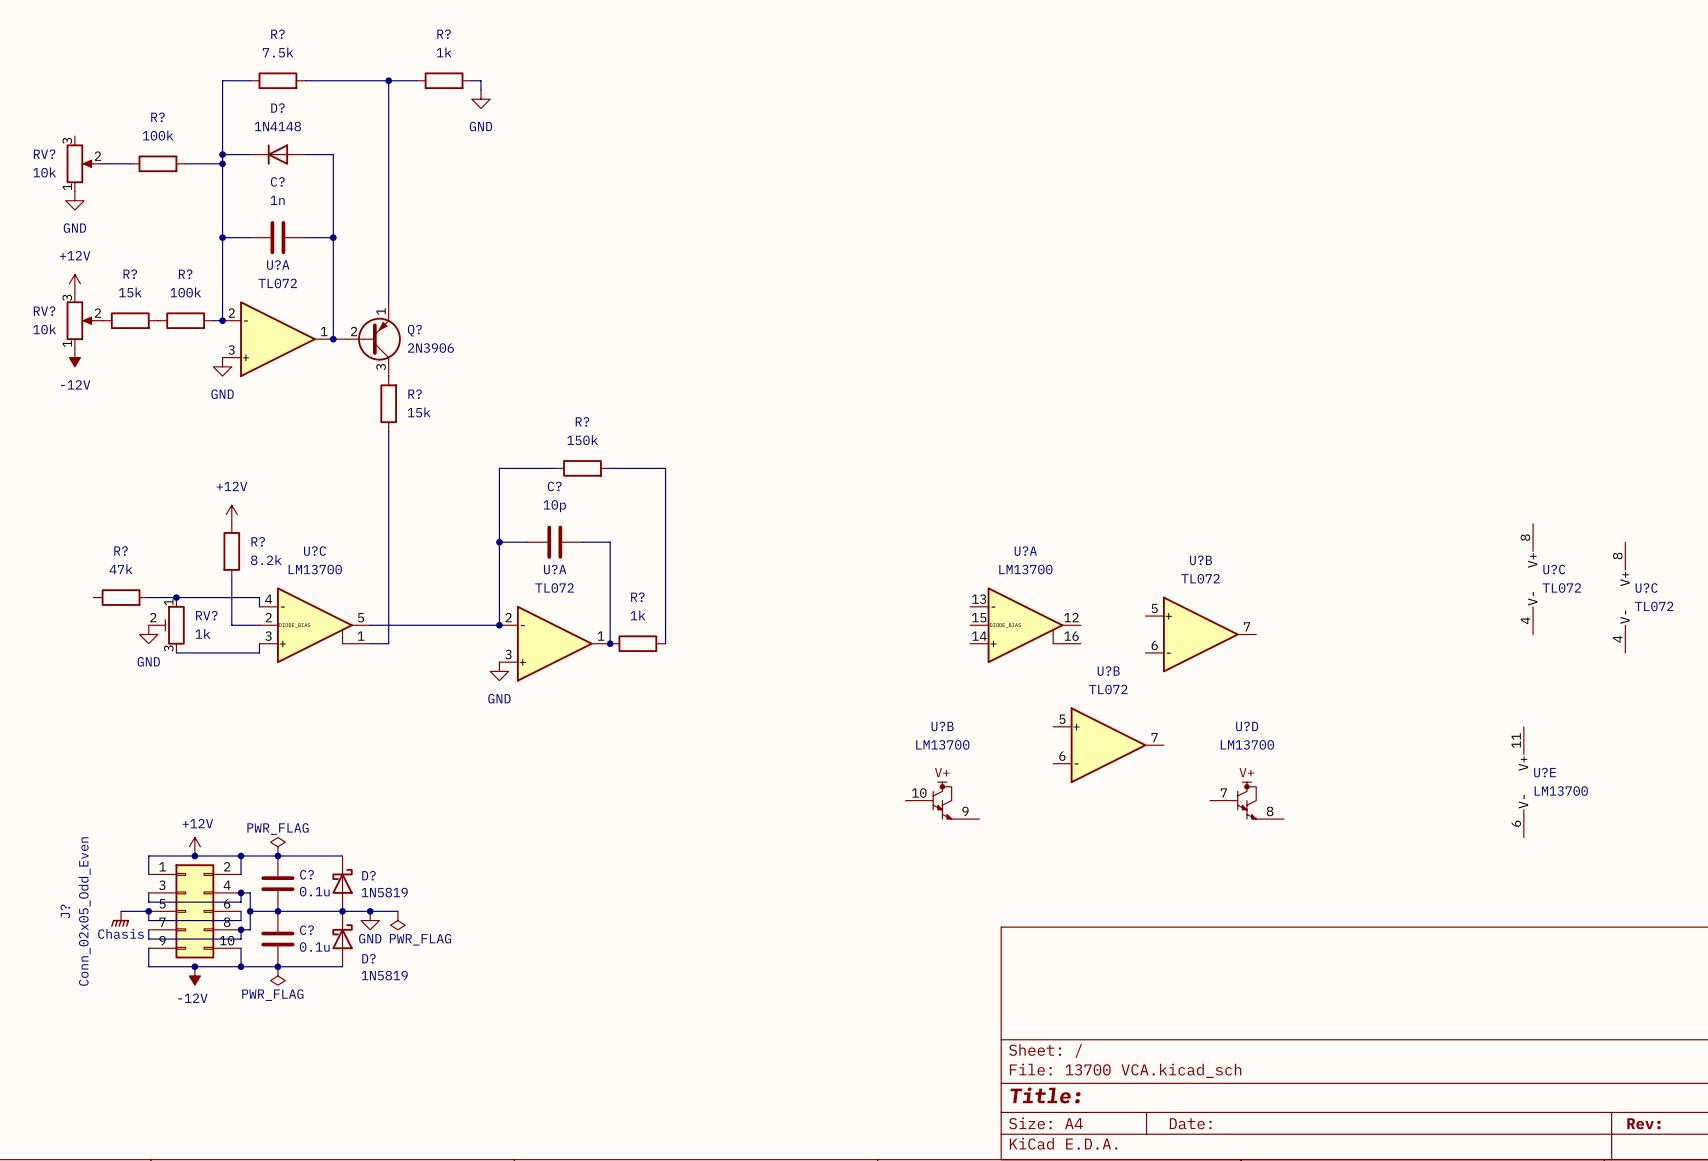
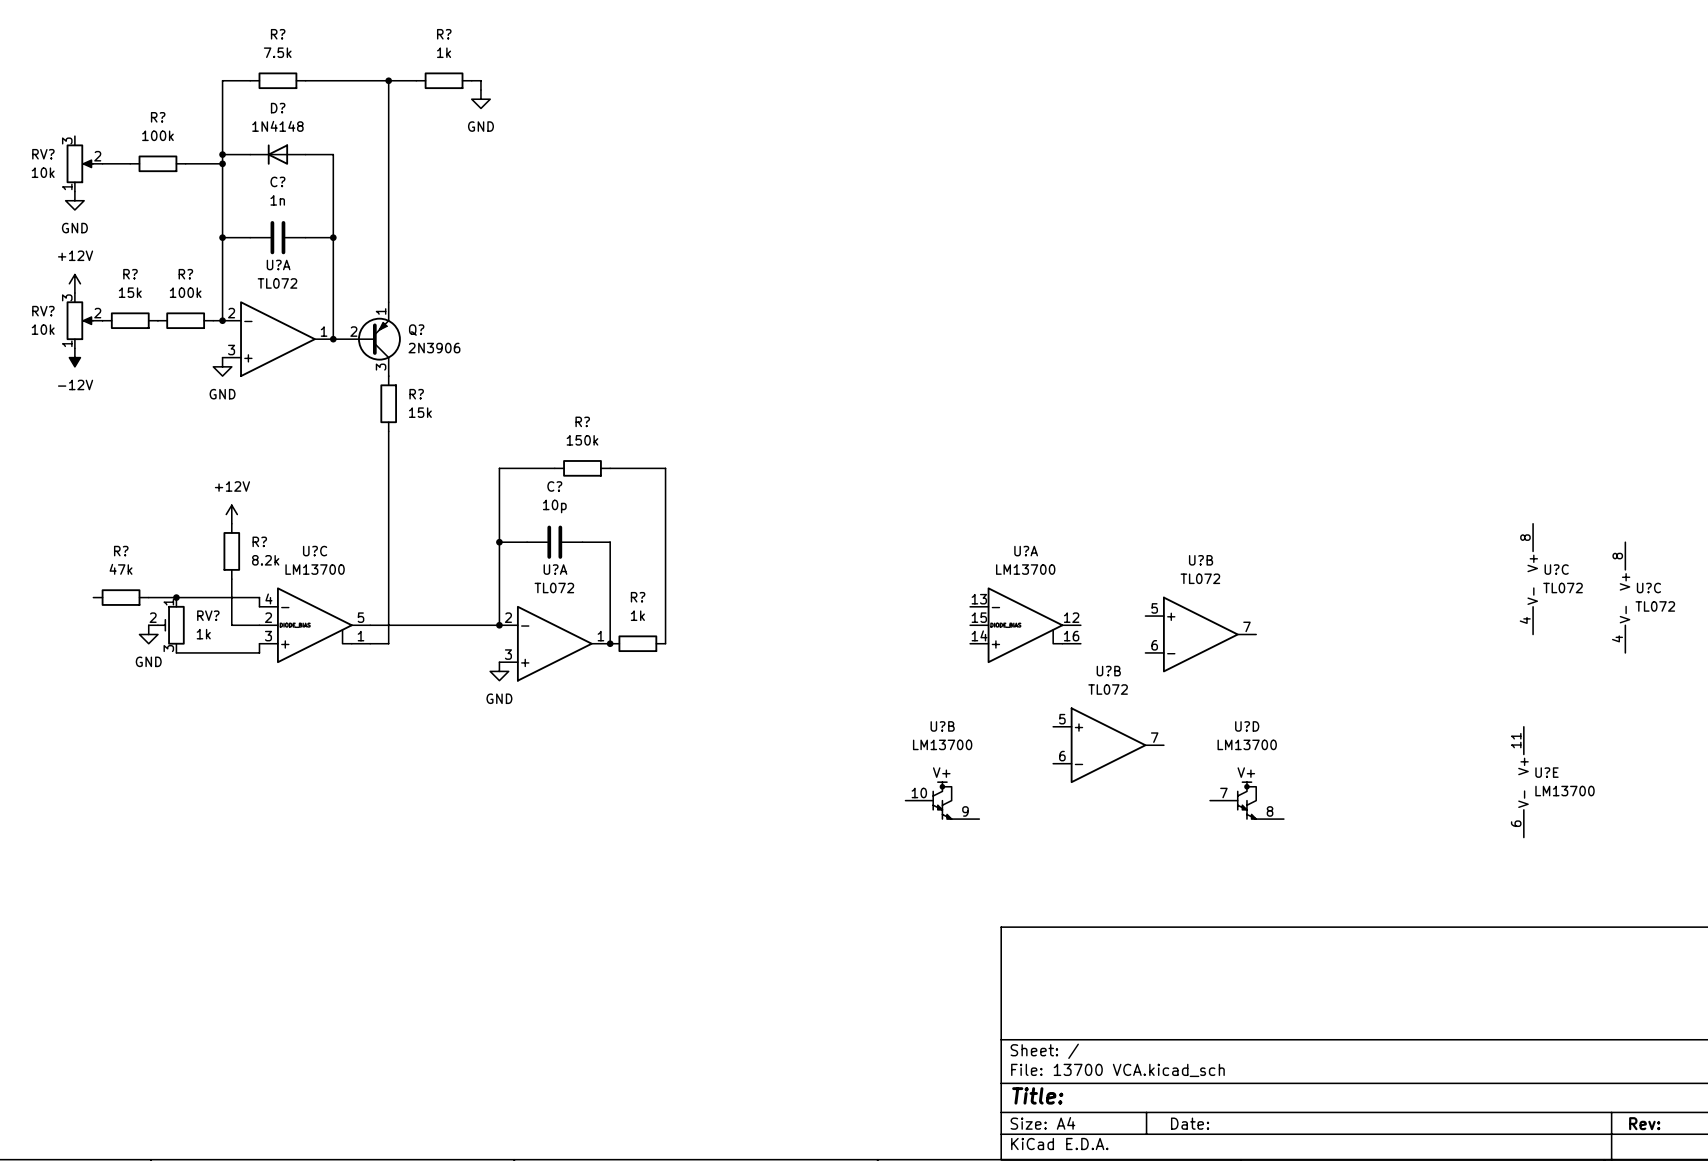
power symbol: +12V (194, 846) -> none
power symbol: PWR_FLAG (277, 846) -> none
junction: (194, 855) -> none
wire: (241, 855) (241, 874) -> none
junction: (241, 855) -> none
junction: (277, 855) -> none
wire: (342, 855) (148, 855) (148, 874) -> none
C?: 0.1u (277, 883) -> none
D?: 1N5819 (342, 883) -> none
wire: (148, 892) (148, 902) (241, 902) (241, 892) (250, 892) (250, 929) (241, 929) (241, 939) (148, 939) (148, 929) -> none
junction: (241, 892) -> none
wire: (121, 911) (148, 911) (148, 920) (241, 920) (241, 911) -> none
junction: (148, 911) -> none
J?: Conn_02x05_Odd_Even (194, 911) -> none
wire: (250, 911) (397, 911) -> none
junction: (250, 911) -> none
junction: (277, 911) -> none
junction: (342, 911) -> none
junction: (370, 911) -> none
power symbol: Chasis (120, 919) -> none
power symbol: GND (370, 920) -> none
power symbol: PWR_FLAG (397, 920) -> none
junction: (241, 929) -> none
C?: 0.1u (277, 939) -> none
D?: 1N5819 (342, 939) -> none
wire: (148, 948) (148, 966) (342, 966) -> none
wire: (241, 948) (241, 966) -> none
junction: (194, 966) -> none
junction: (241, 966) -> none
junction: (277, 966) -> none
power symbol: -12V (194, 975) -> none
power symbol: PWR_FLAG (277, 975) -> none

